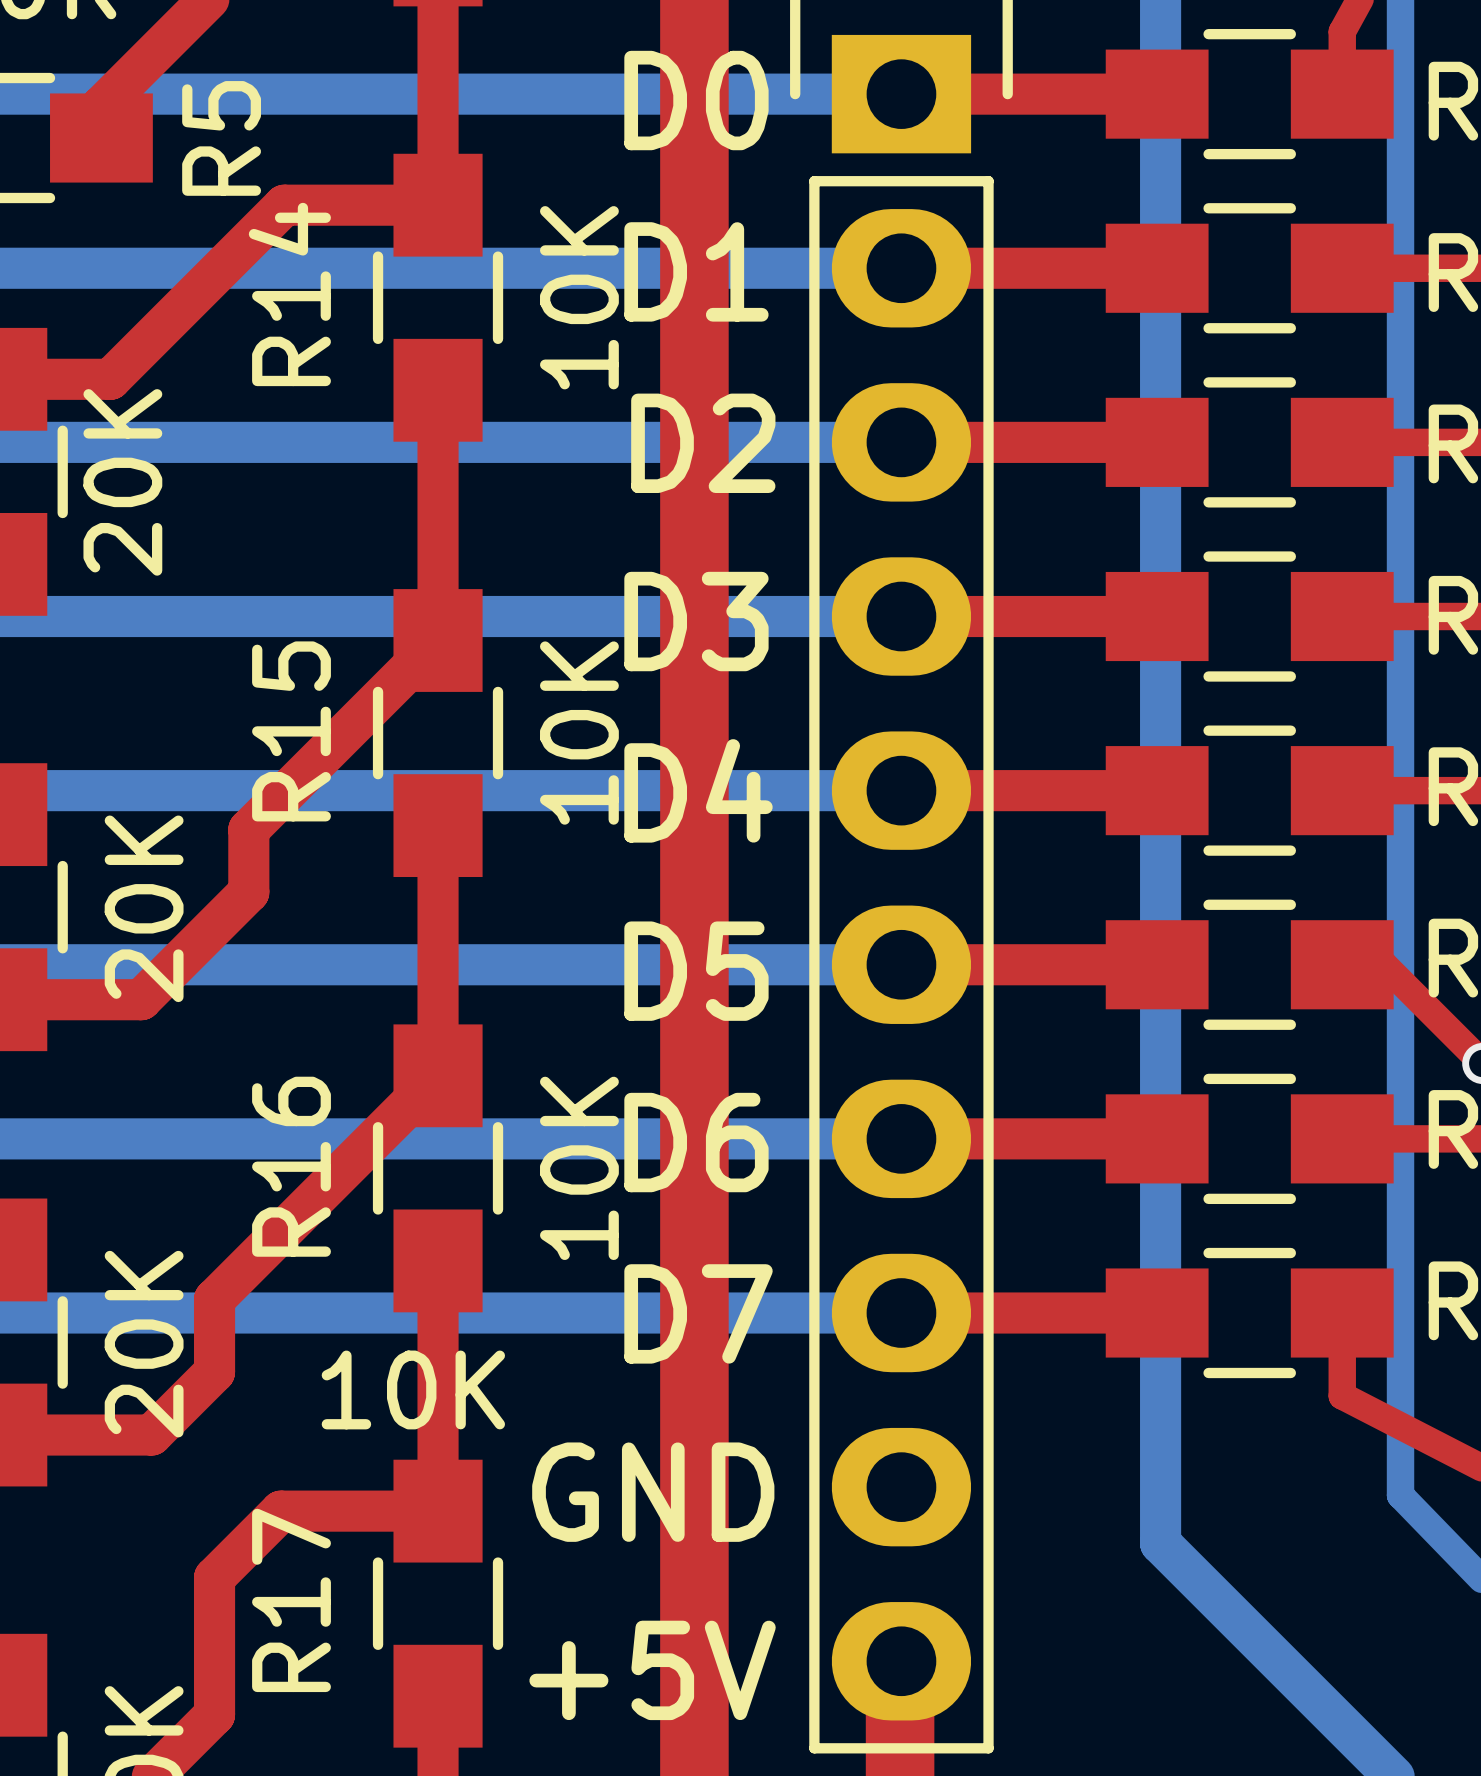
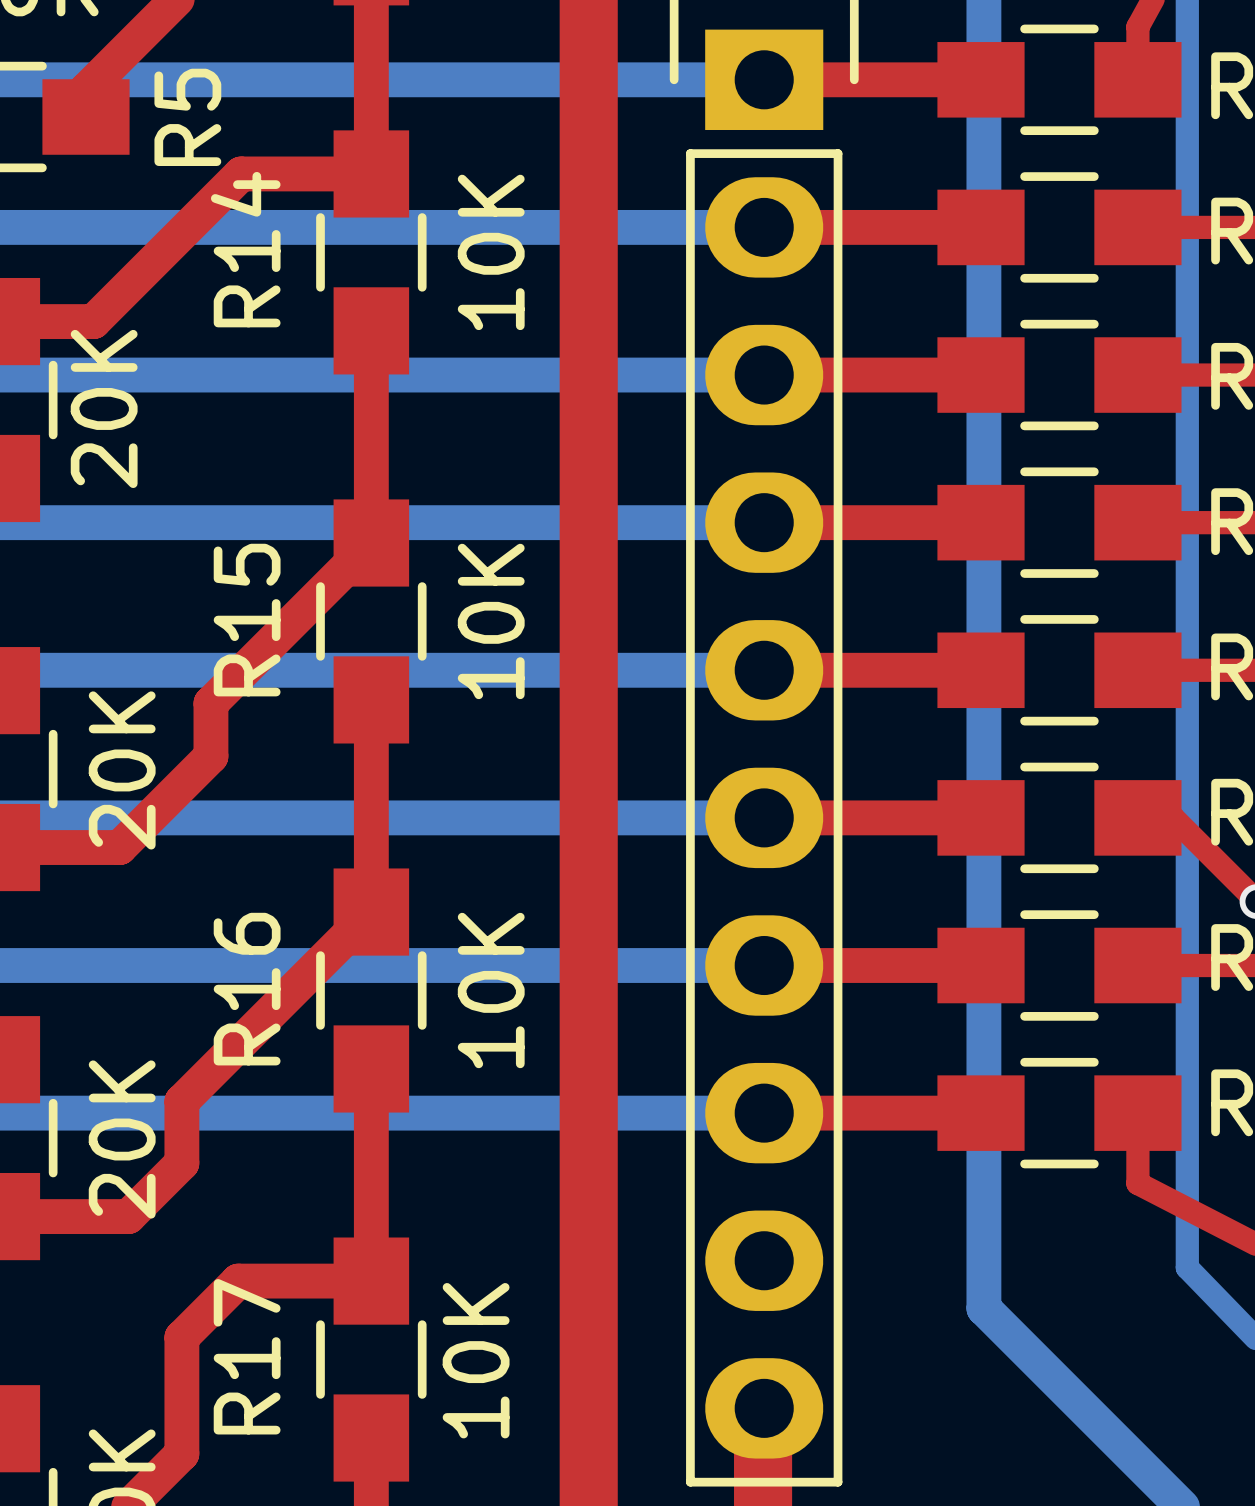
text: D0 (696, 100) -> none
text: D1 (696, 271) -> none
text: D2 (703, 443) -> none
text: D3 (696, 621) -> none
text: D4 (698, 790) -> none
text: D5 (696, 971) -> none
text: D6 (696, 1142) -> none
text: D7 (698, 1313) -> none
R17 value rotation: 0° (413, 1389) -> 90° counterclockwise (476, 1360)
R17 value position: 10K (413, 1389) -> 10K (476, 1360)
text: GND (653, 1492) -> none
text: +5V (652, 1670) -> none

